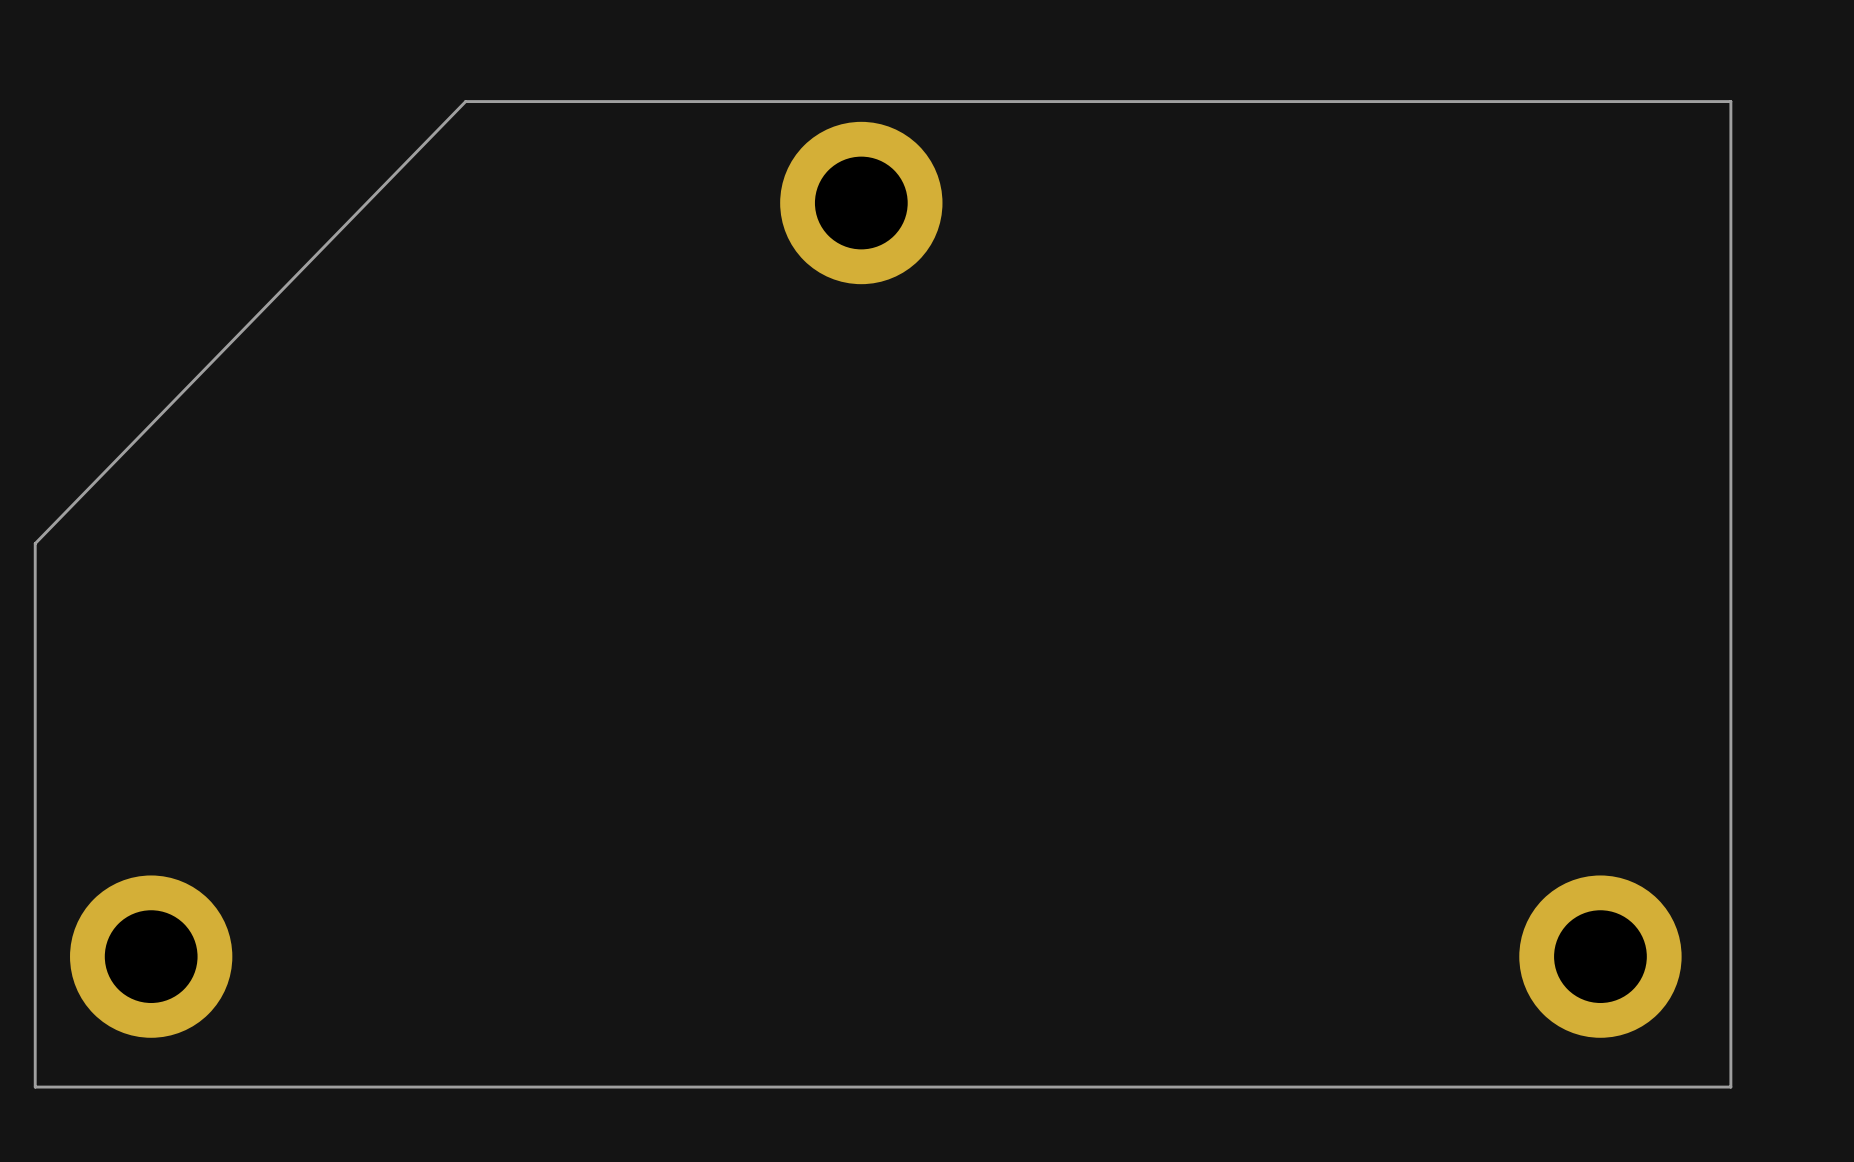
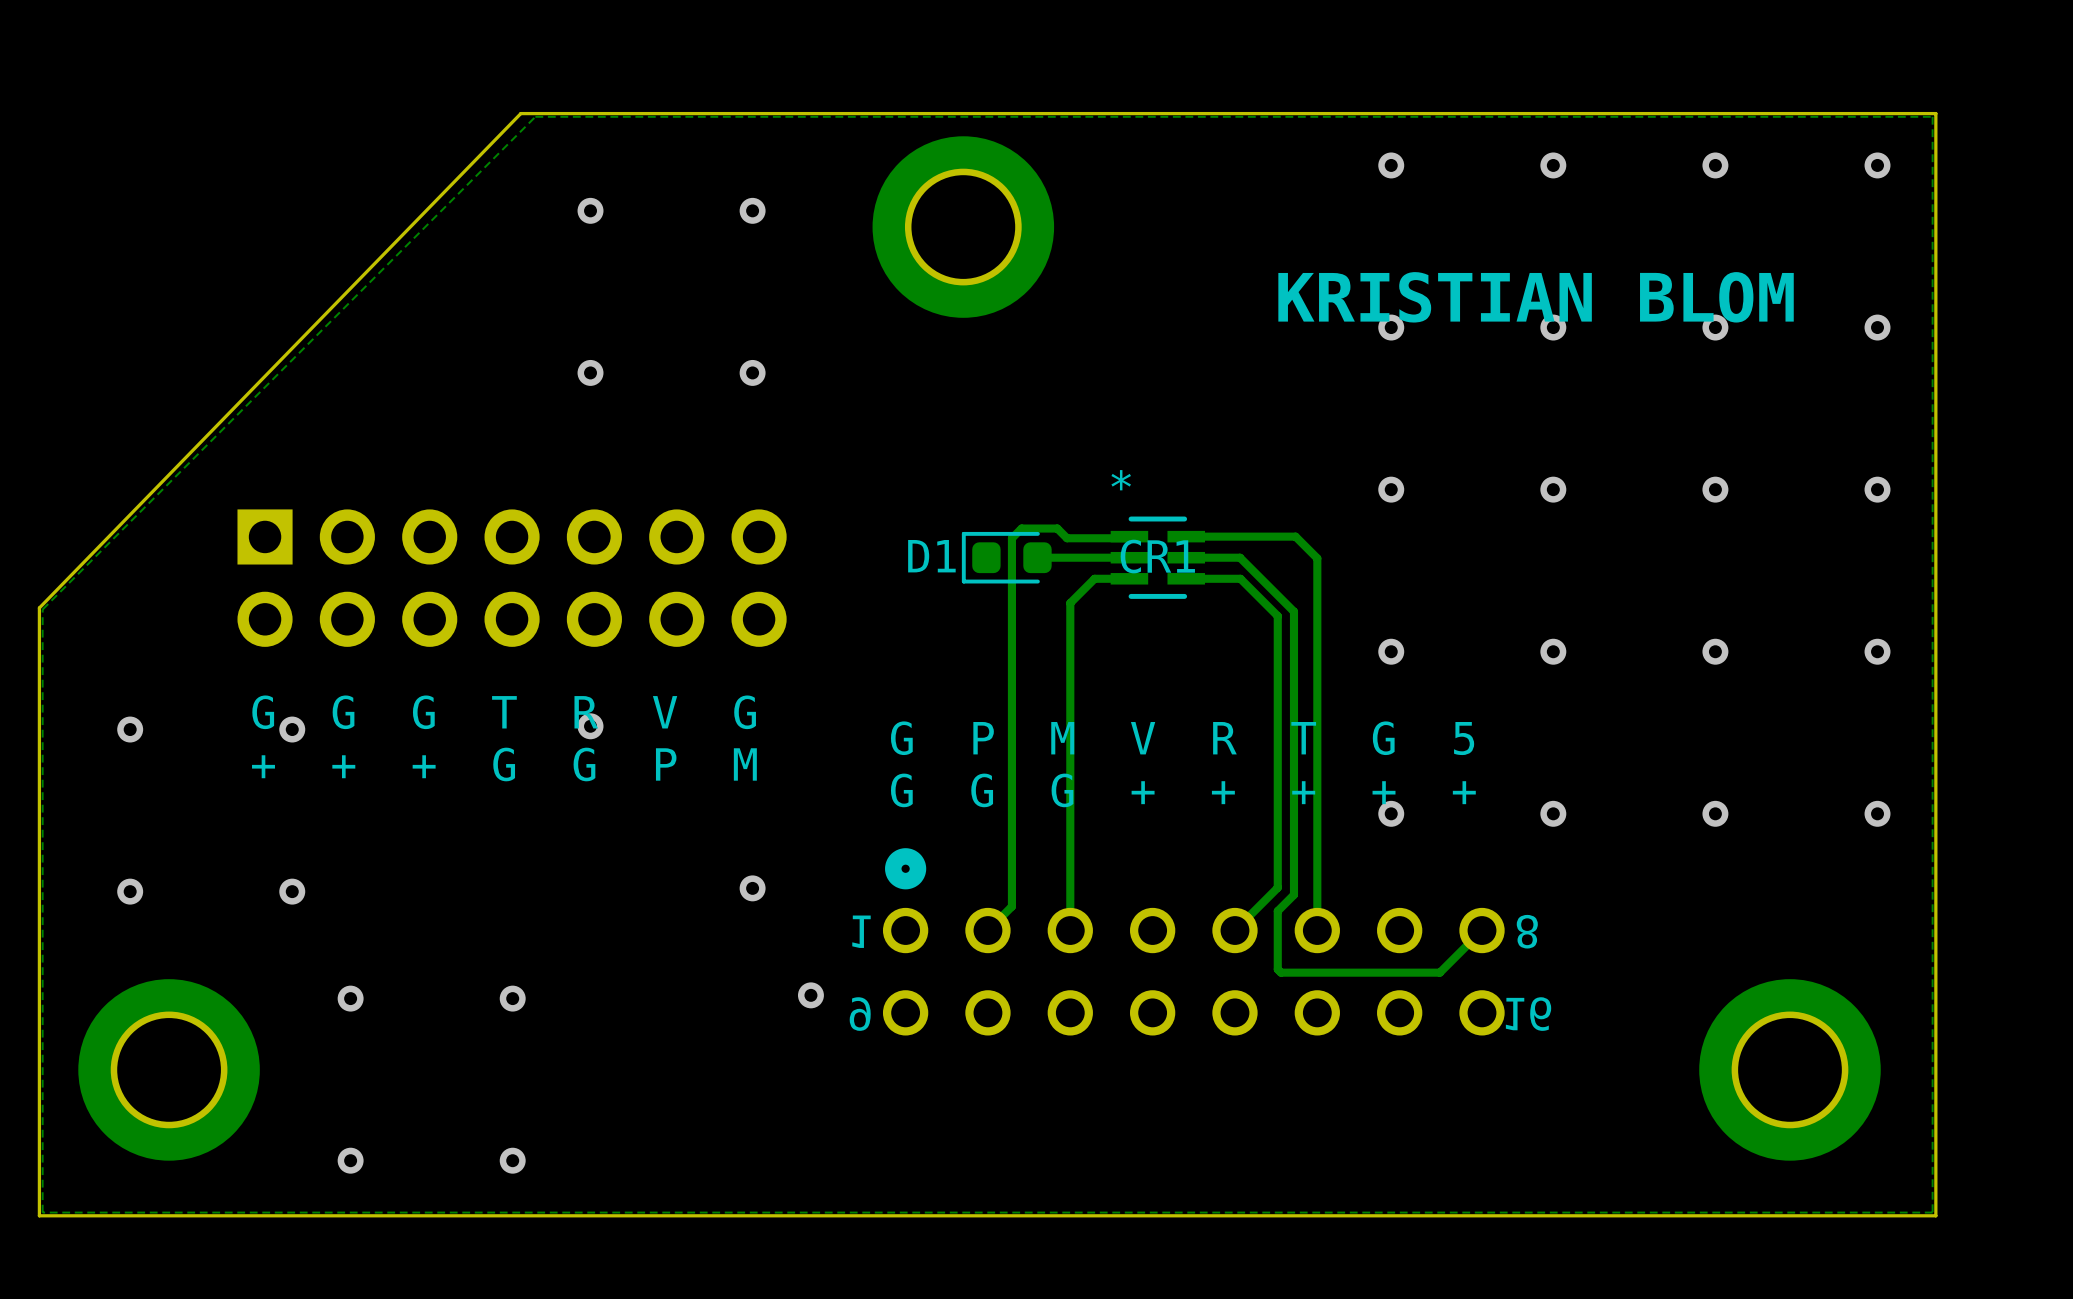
zone outline: none -> (1932, 116) (1932, 1212) (42, 1212) (42, 609) (535, 116) (1932, 116)
via: none -> (1391, 165)
via: none -> (1553, 165)
via: none -> (1715, 165)
via: none -> (1877, 165)
via: none -> (590, 210)
via: none -> (752, 210)
text: none -> KRISTIAN BLOM (1536, 297)
via: none -> (1391, 327)
via: none -> (1553, 327)
via: none -> (1715, 327)
via: none -> (1877, 327)
via: none -> (590, 372)
via: none -> (752, 372)
via: none -> (1391, 489)
via: none -> (1553, 489)
via: none -> (1715, 489)
via: none -> (1877, 489)
track: none -> (1129, 536) (1127, 538) (1067, 538) (1057, 528) (1021, 528) (1011, 538) (1011, 906) (987, 930)
track: none -> (1186, 536) (1295, 536) (1317, 558) (1317, 930)
D1: none -> (1006, 557)
track: none -> (1129, 557) (1037, 557)
CR1: none -> (1157, 557)
track: none -> (1186, 557) (1240, 557) (1293, 611) (1293, 894) (1277, 911) (1277, 969) (1281, 972) (1439, 972) (1482, 930)
part: none -> (512, 578)
track: none -> (1129, 578) (1094, 578) (1070, 603) (1070, 930)
track: none -> (1186, 578) (1240, 578) (1277, 616) (1277, 887) (1234, 930)
via: none -> (1391, 651)
via: none -> (1553, 651)
via: none -> (1715, 651)
via: none -> (1877, 651)
text: none -> G G G T R V G (504, 712)
via: none -> (590, 726)
via: none -> (130, 729)
via: none -> (292, 729)
text: none -> G P M V R T G 5 (1182, 738)
text: none -> + + + G G P M (504, 764)
text: none -> G G G + + + + + (1183, 790)
via: none -> (1391, 813)
via: none -> (1553, 813)
via: none -> (1715, 813)
via: none -> (1877, 813)
via: none -> (752, 888)
via: none -> (130, 891)
via: none -> (292, 891)
part: none -> (1193, 941)
via: none -> (810, 995)
via: none -> (350, 998)
via: none -> (512, 998)
via: none -> (350, 1160)
via: none -> (512, 1160)

